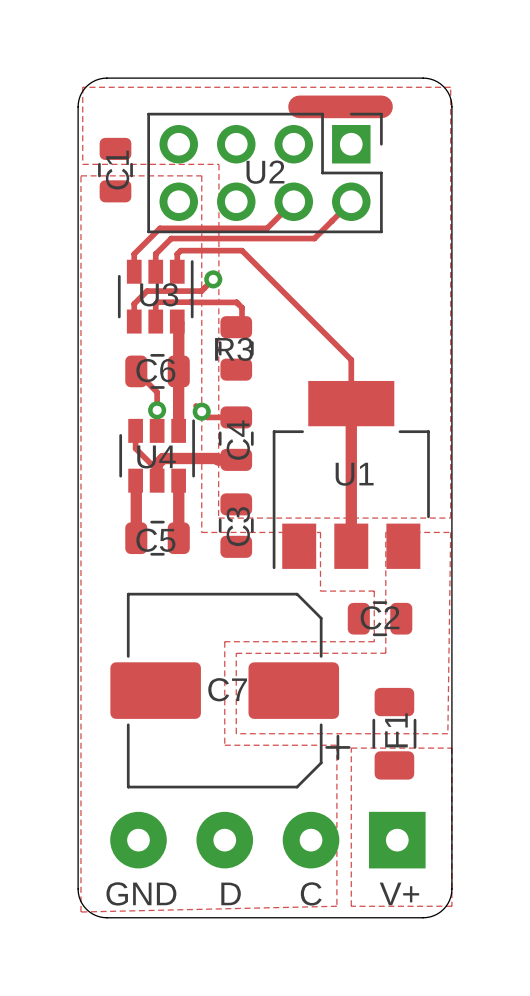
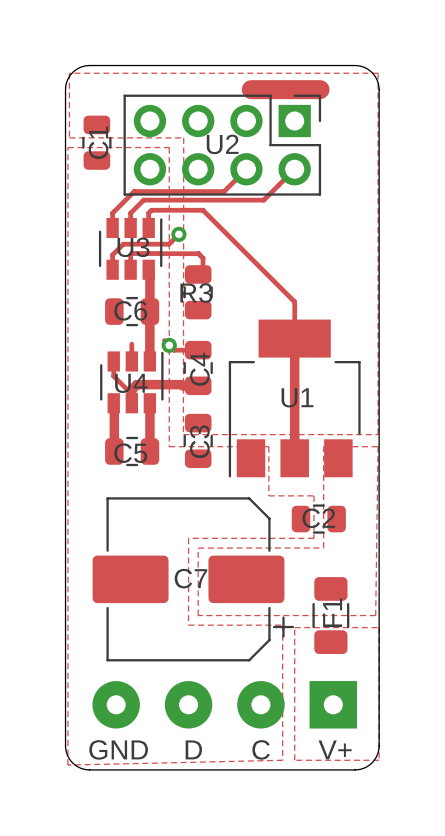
track: (136, 371) (157, 392) (157, 410) -> none
via: (157, 410) -> none

